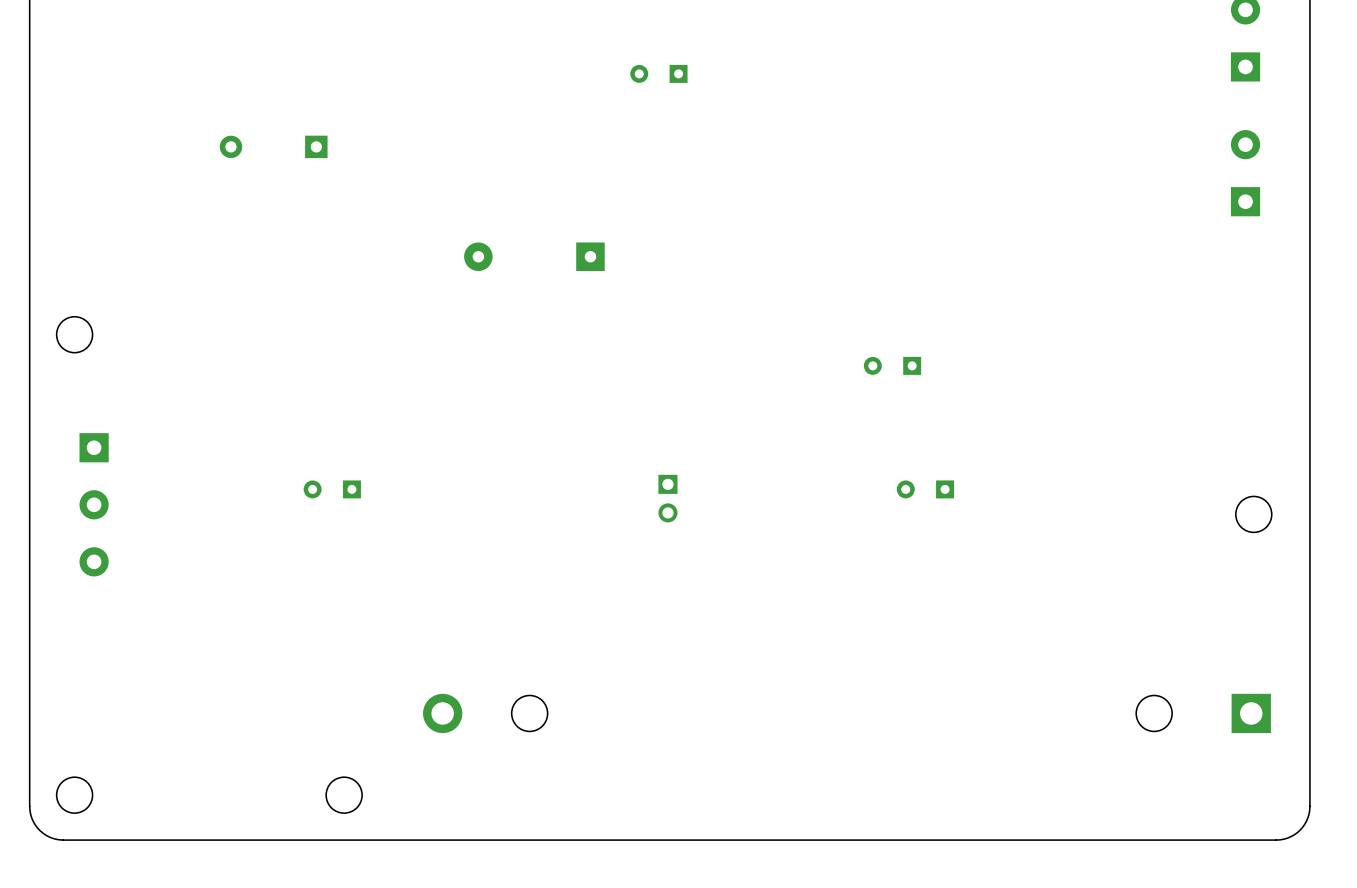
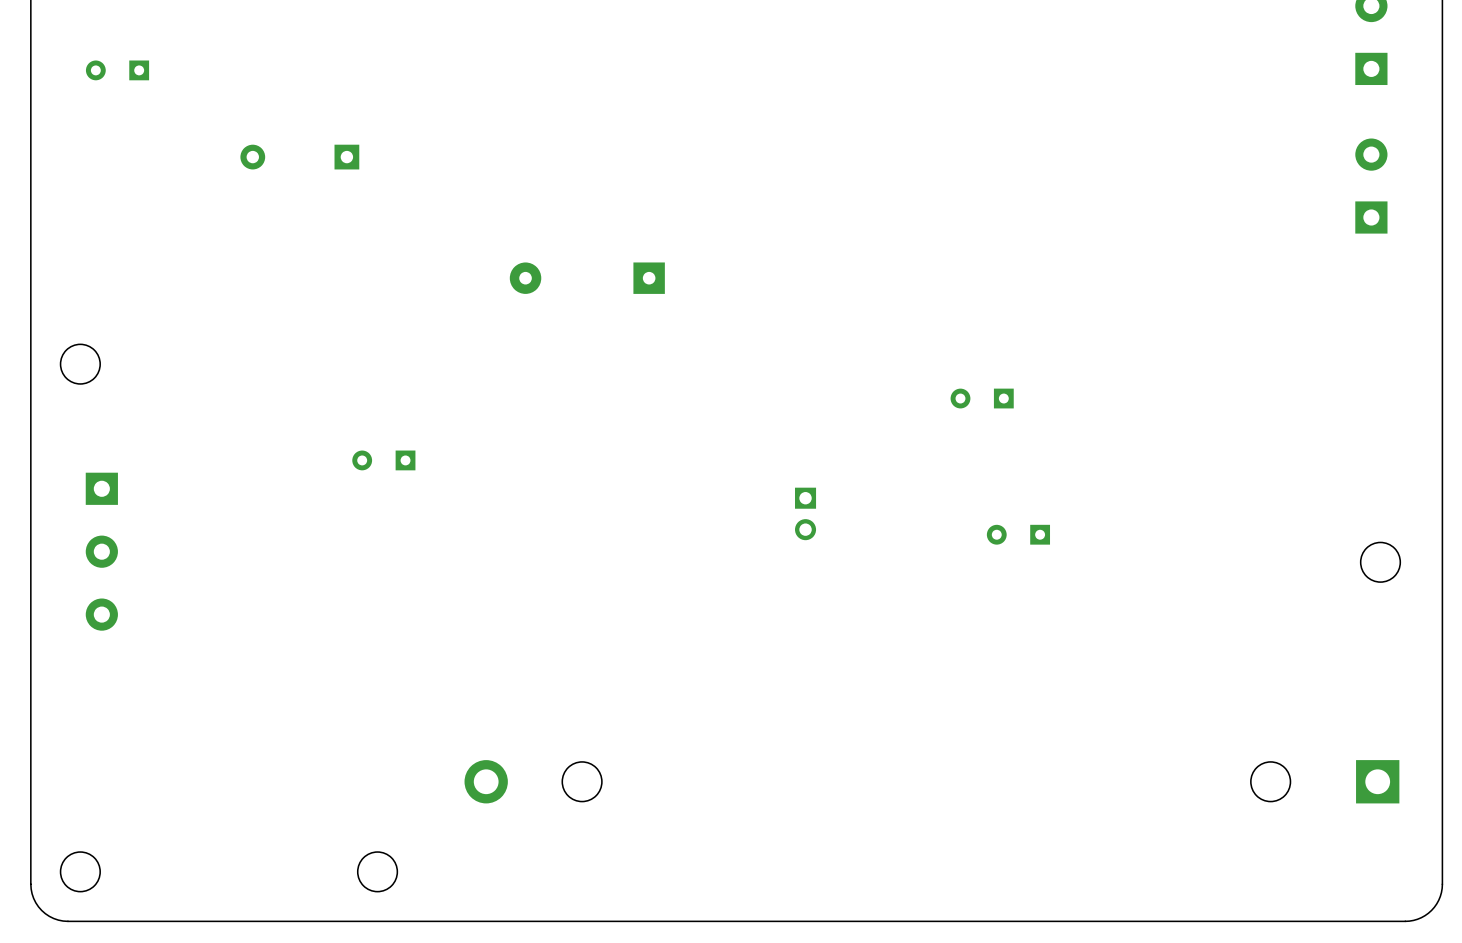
part: none -> (117, 70)
part: (658, 73) -> none
part position: (332, 489) -> (383, 460)
part position: (667, 498) -> (805, 513)

